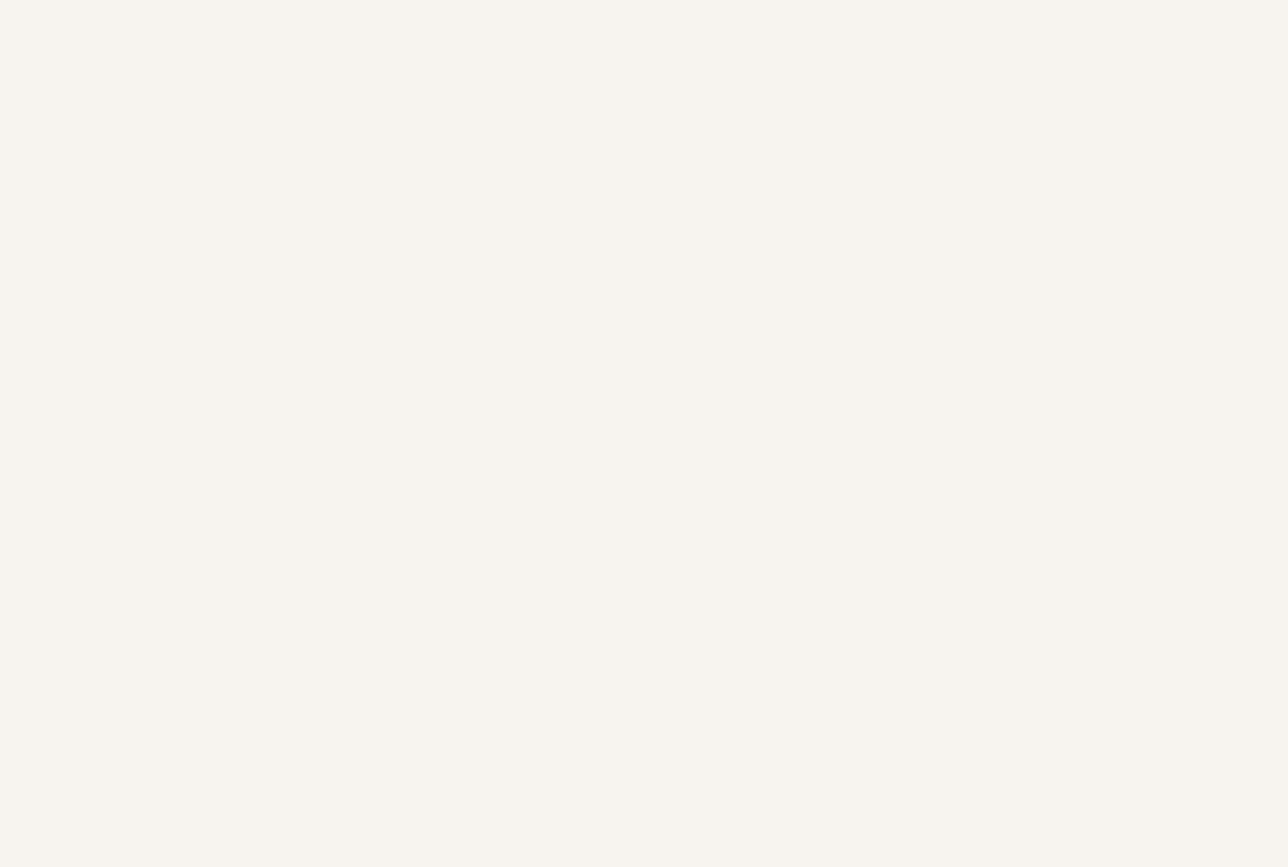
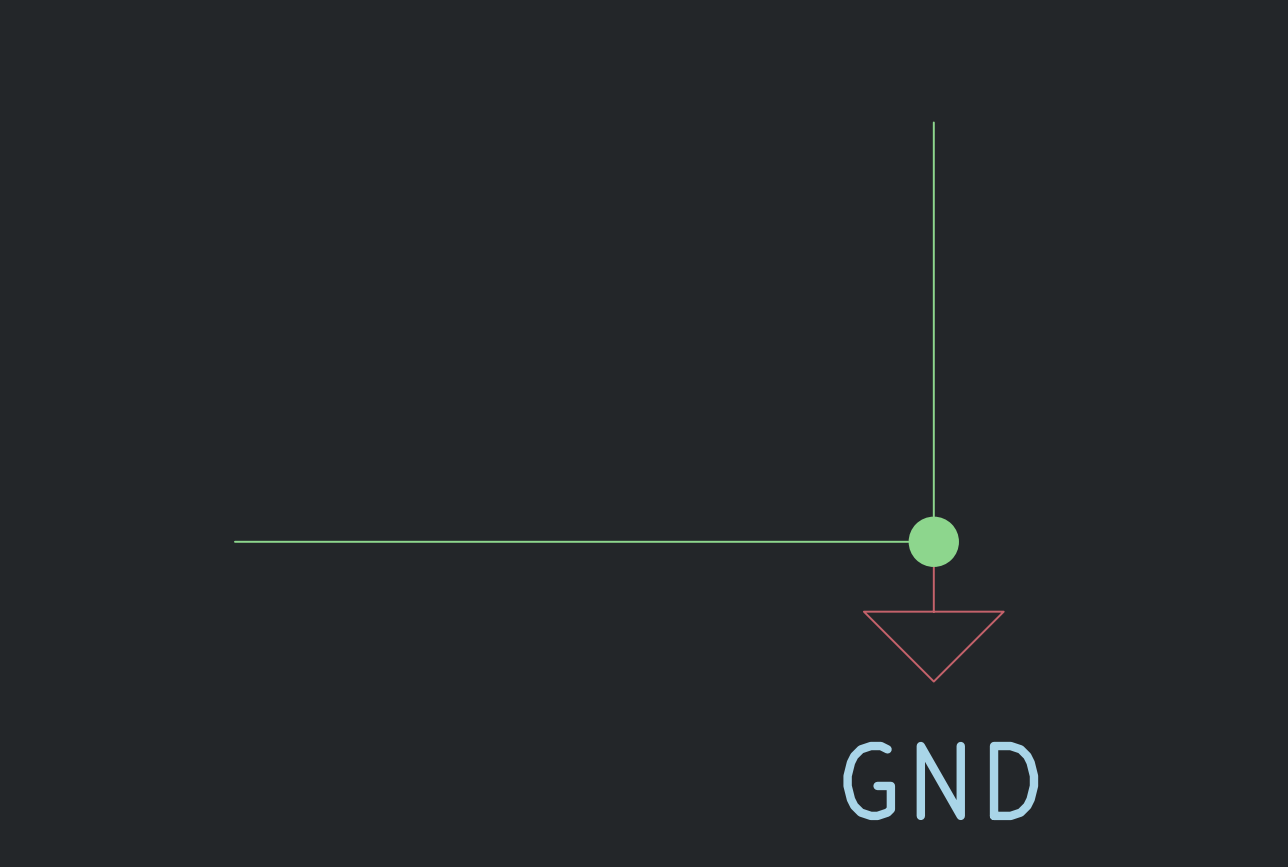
wire: none -> (933, 122) (933, 541) (234, 541)
junction: none -> (933, 541)
power symbol: none -> GND (933, 611)

